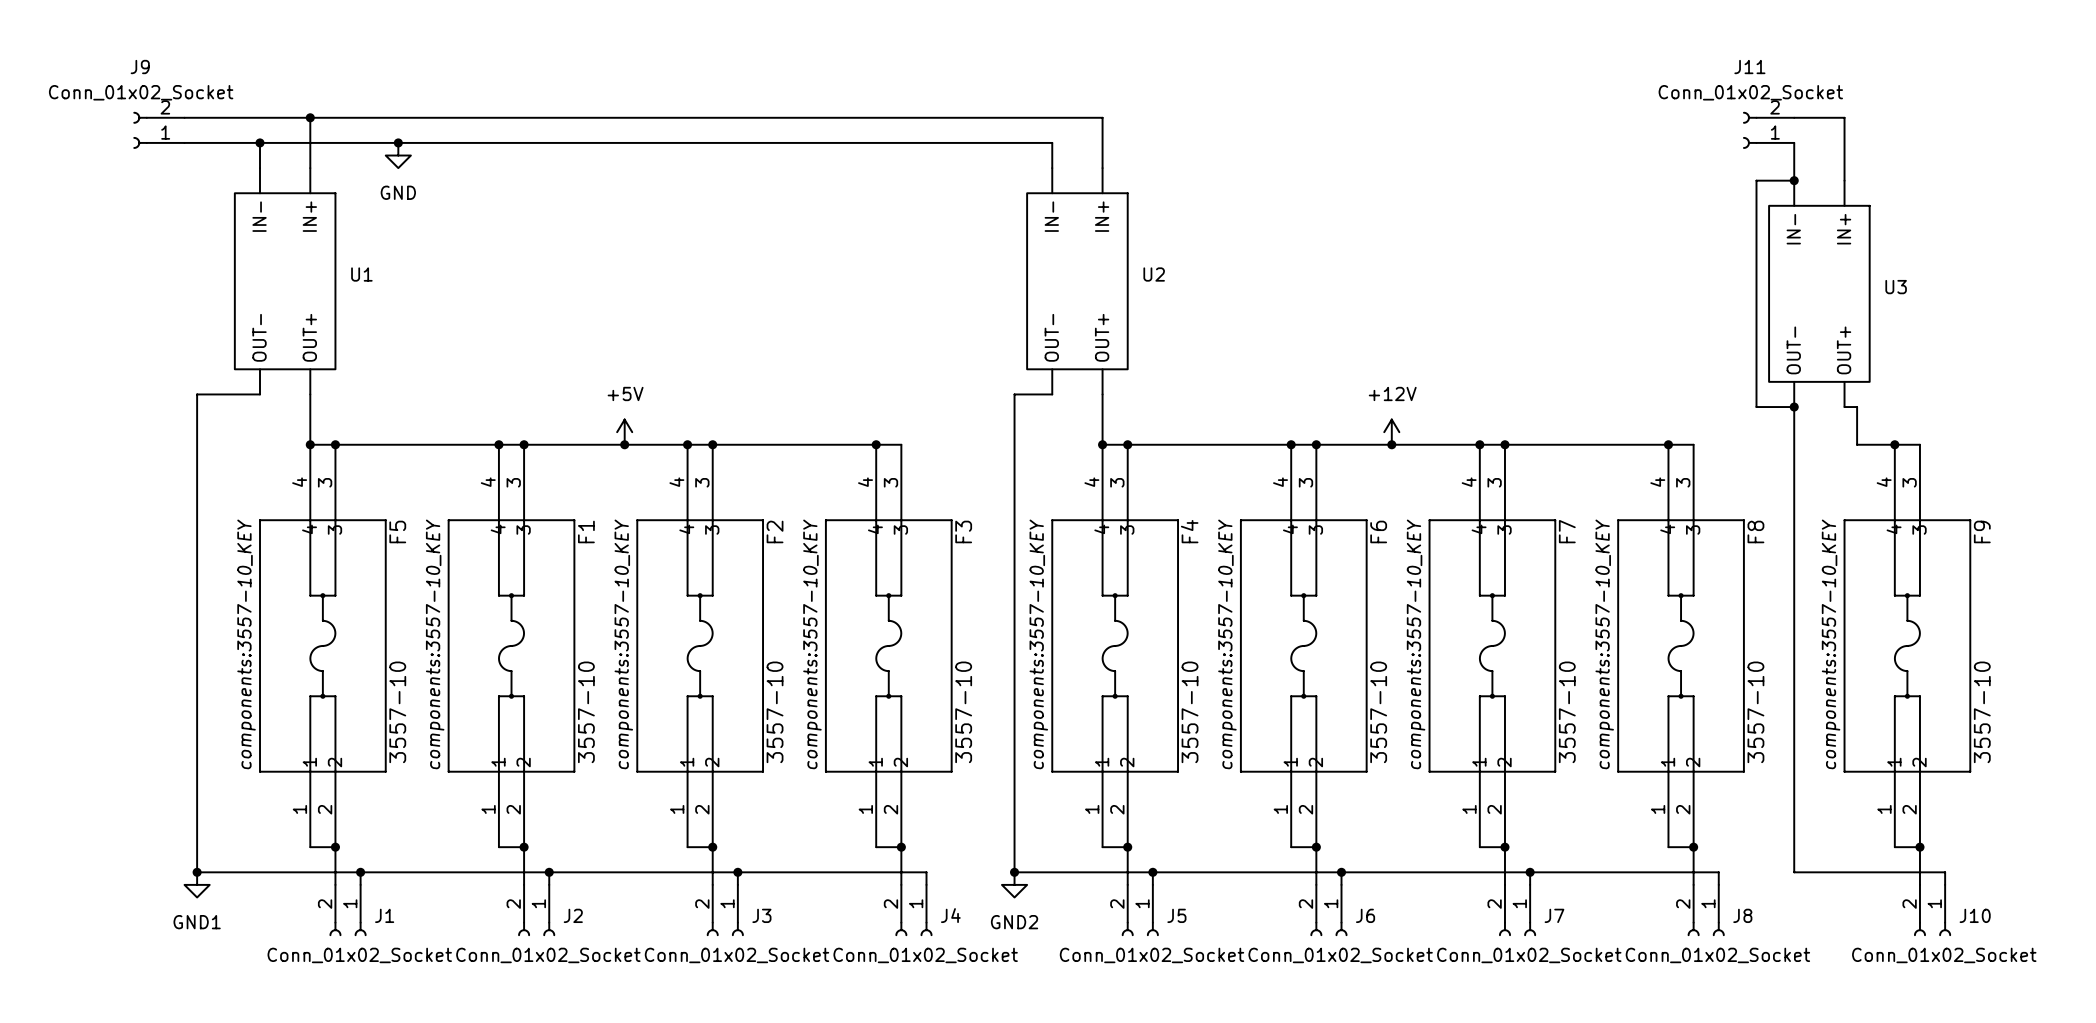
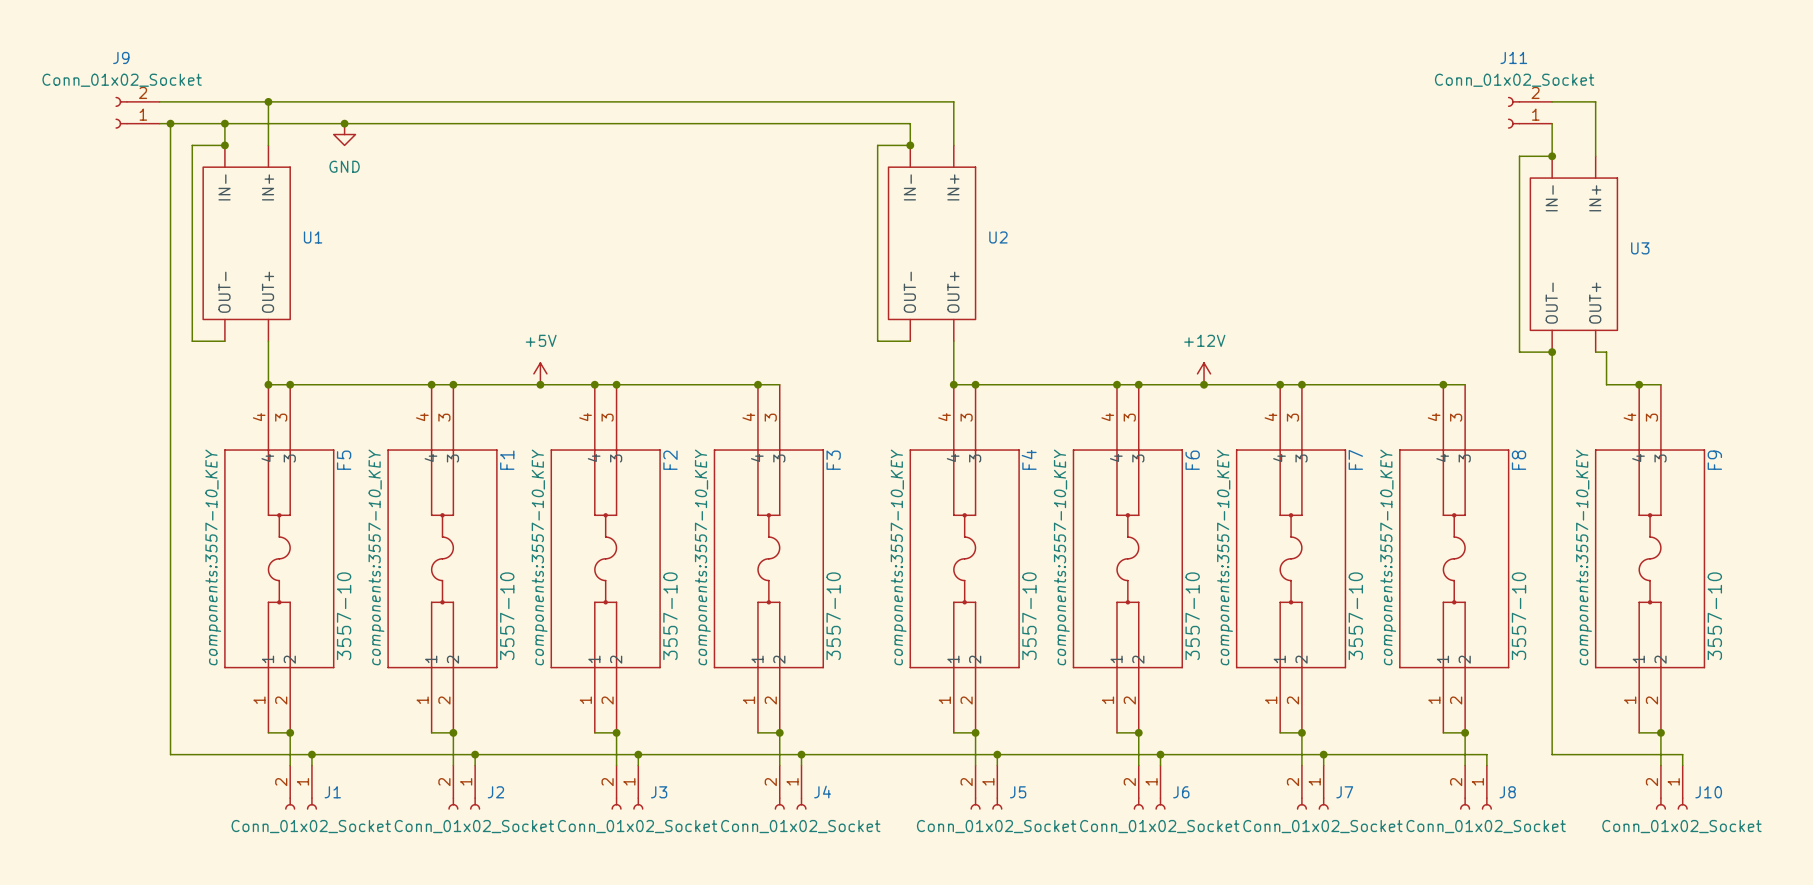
wire: none -> (170, 123) (170, 341)
junction: none -> (170, 123)
junction: none -> (224, 145)
wire: none -> (910, 145) (877, 145) (877, 341)
junction: none -> (910, 145)
wire: (197, 394) (222, 394) -> (224, 145) (192, 145) (192, 341)
wire: (1014, 394) (1014, 872) -> (801, 754) (877, 754)
junction: (197, 872) -> none
junction: none -> (801, 754)
junction: (1014, 872) -> none
power symbol: GND1 (197, 884) -> none
power symbol: GND2 (1014, 884) -> none

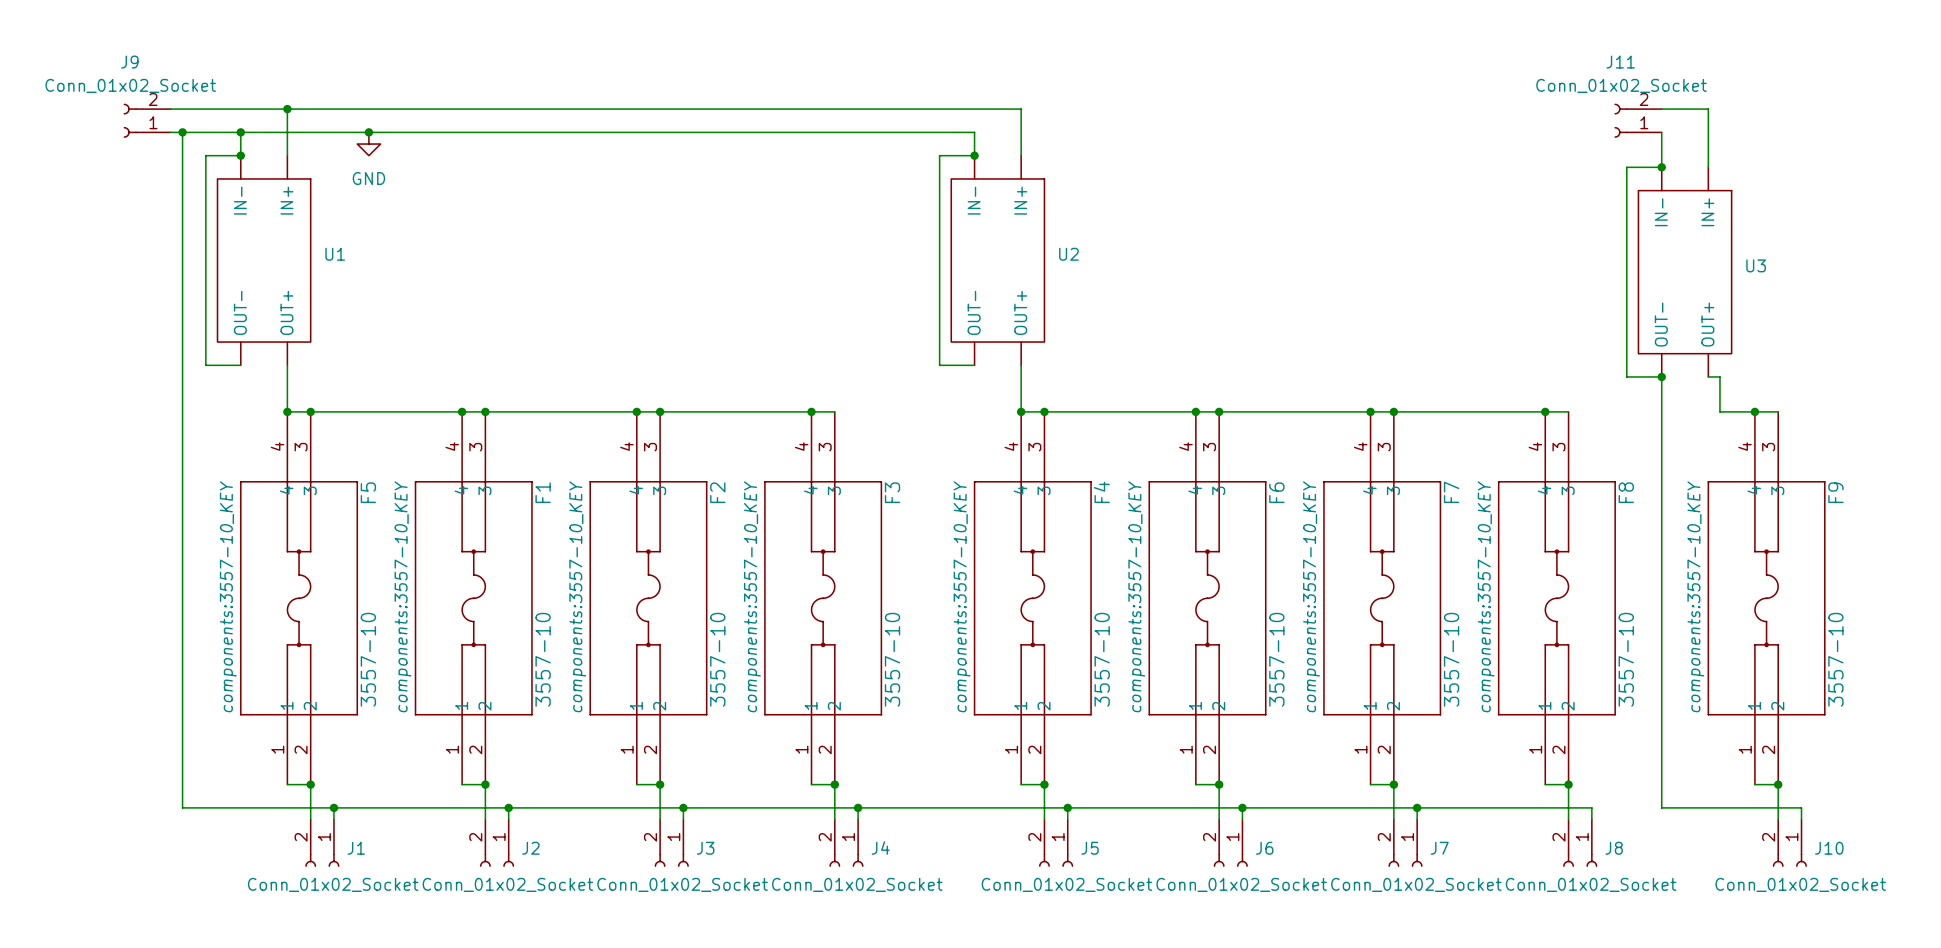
power symbol: +5V (540, 373) -> none
power symbol: +12V (1204, 373) -> none
junction: (540, 384) -> none
junction: (1204, 384) -> none

